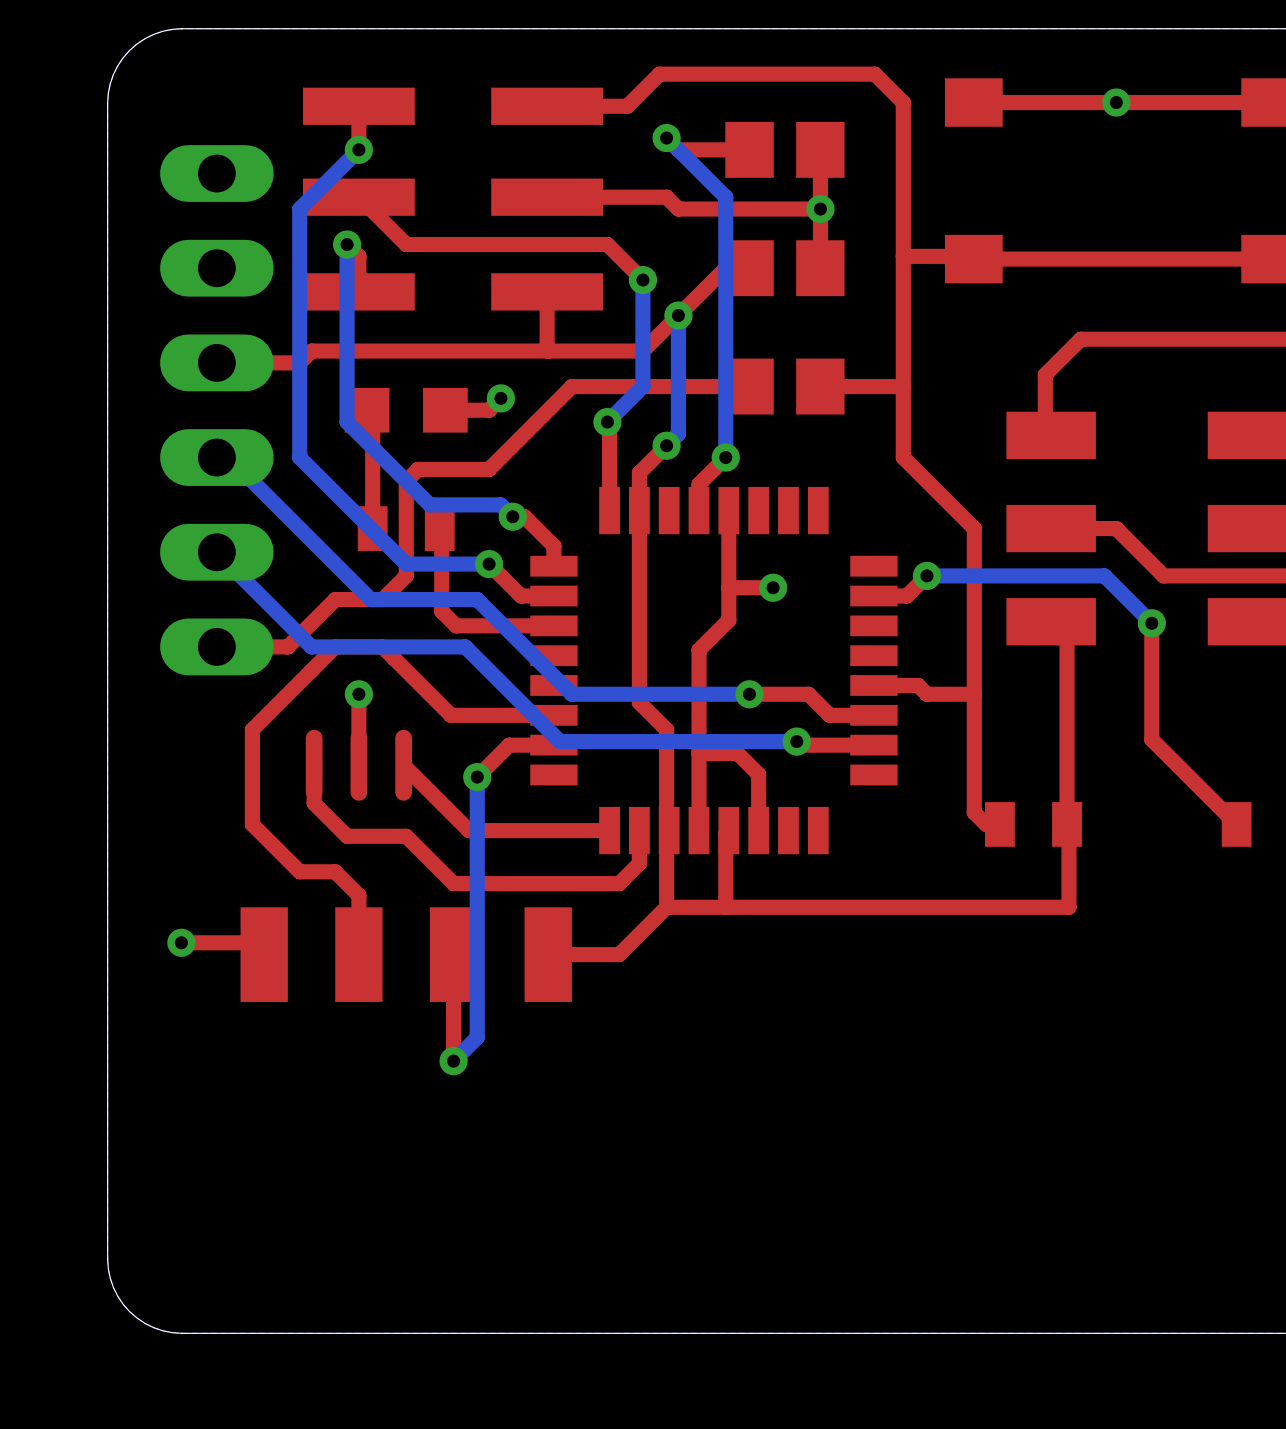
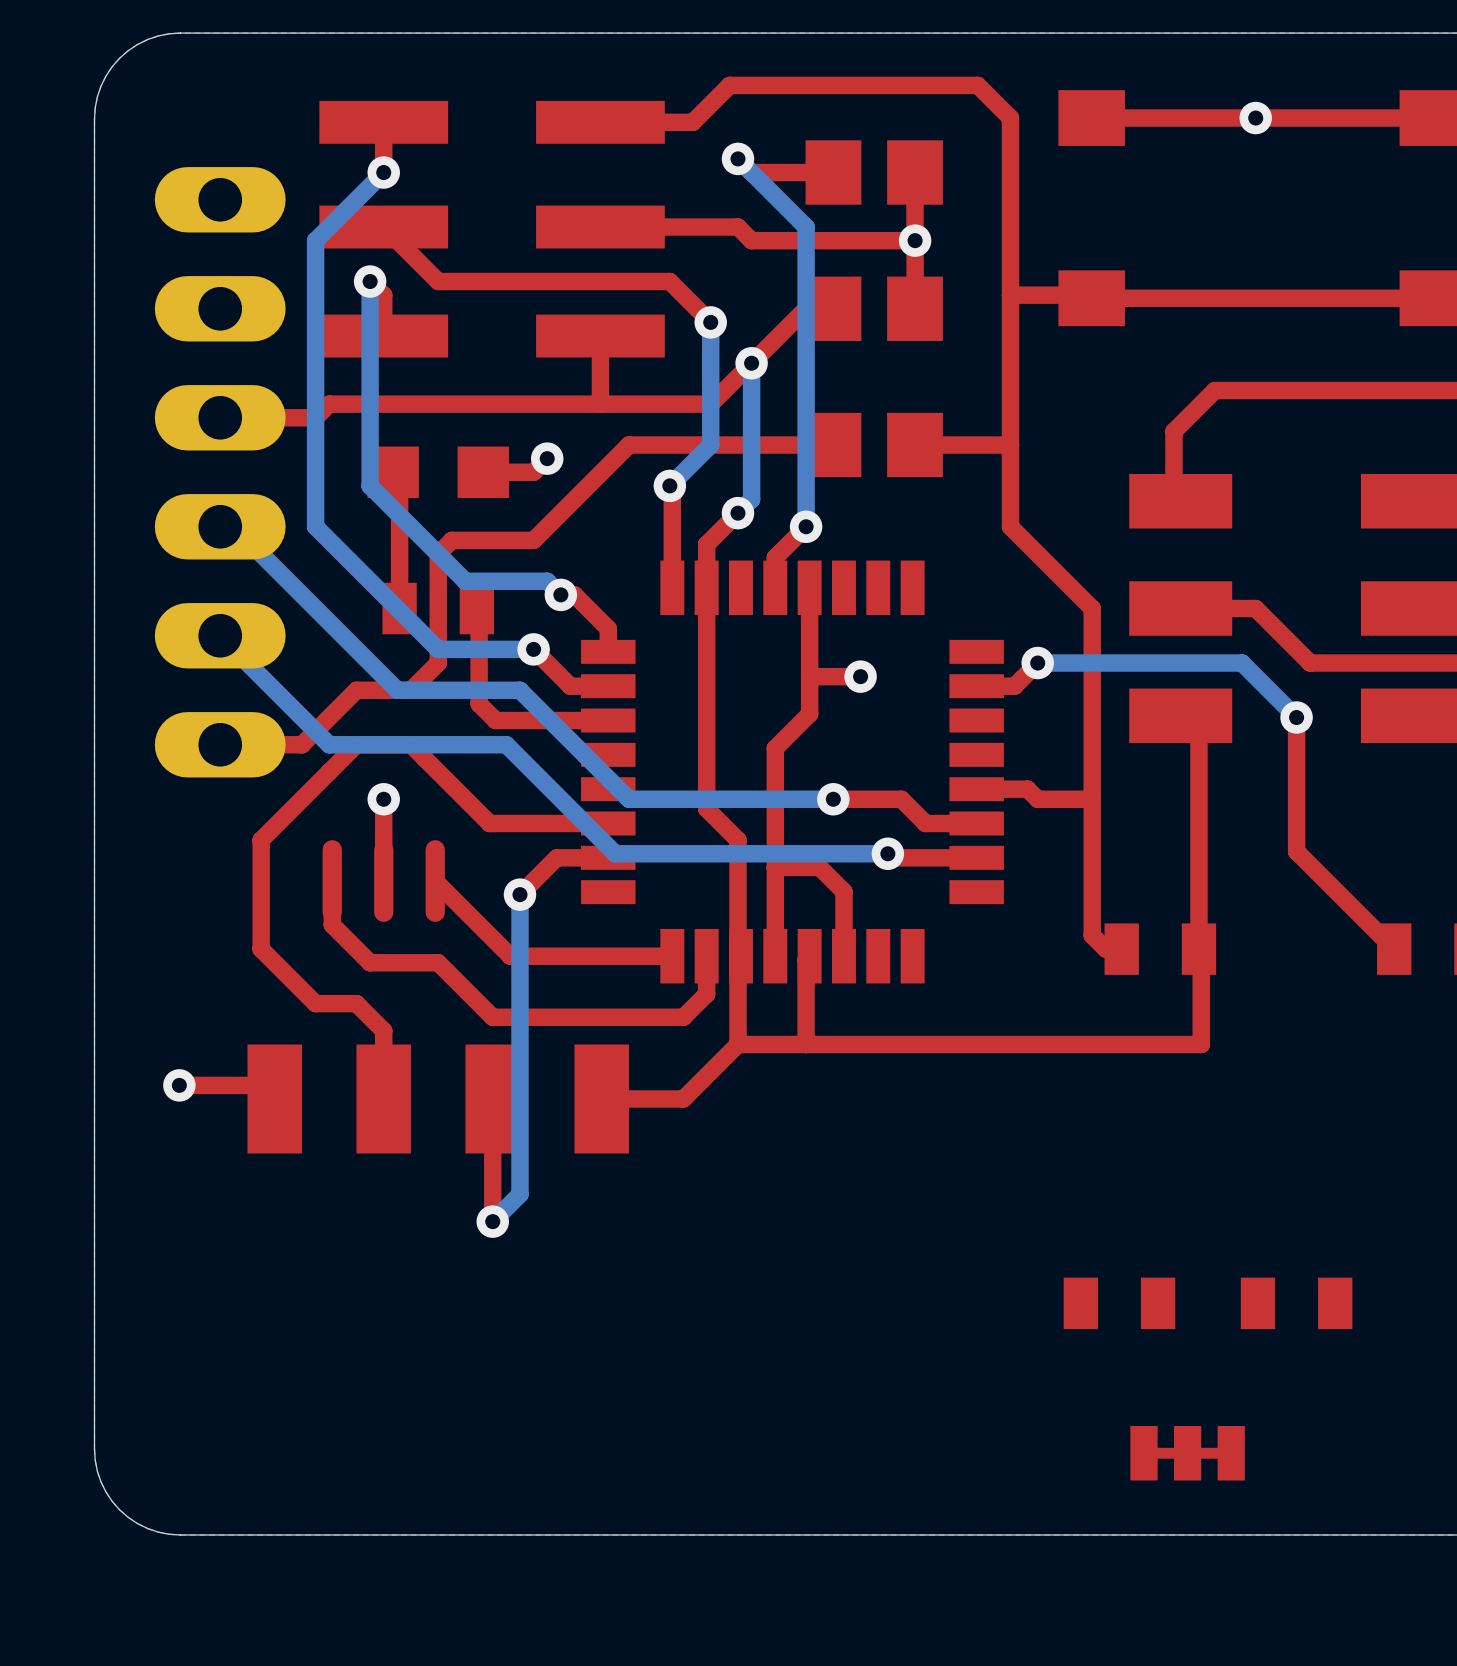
part: none -> (1119, 1303)
part: none -> (1296, 1303)
part: none -> (1187, 1453)

